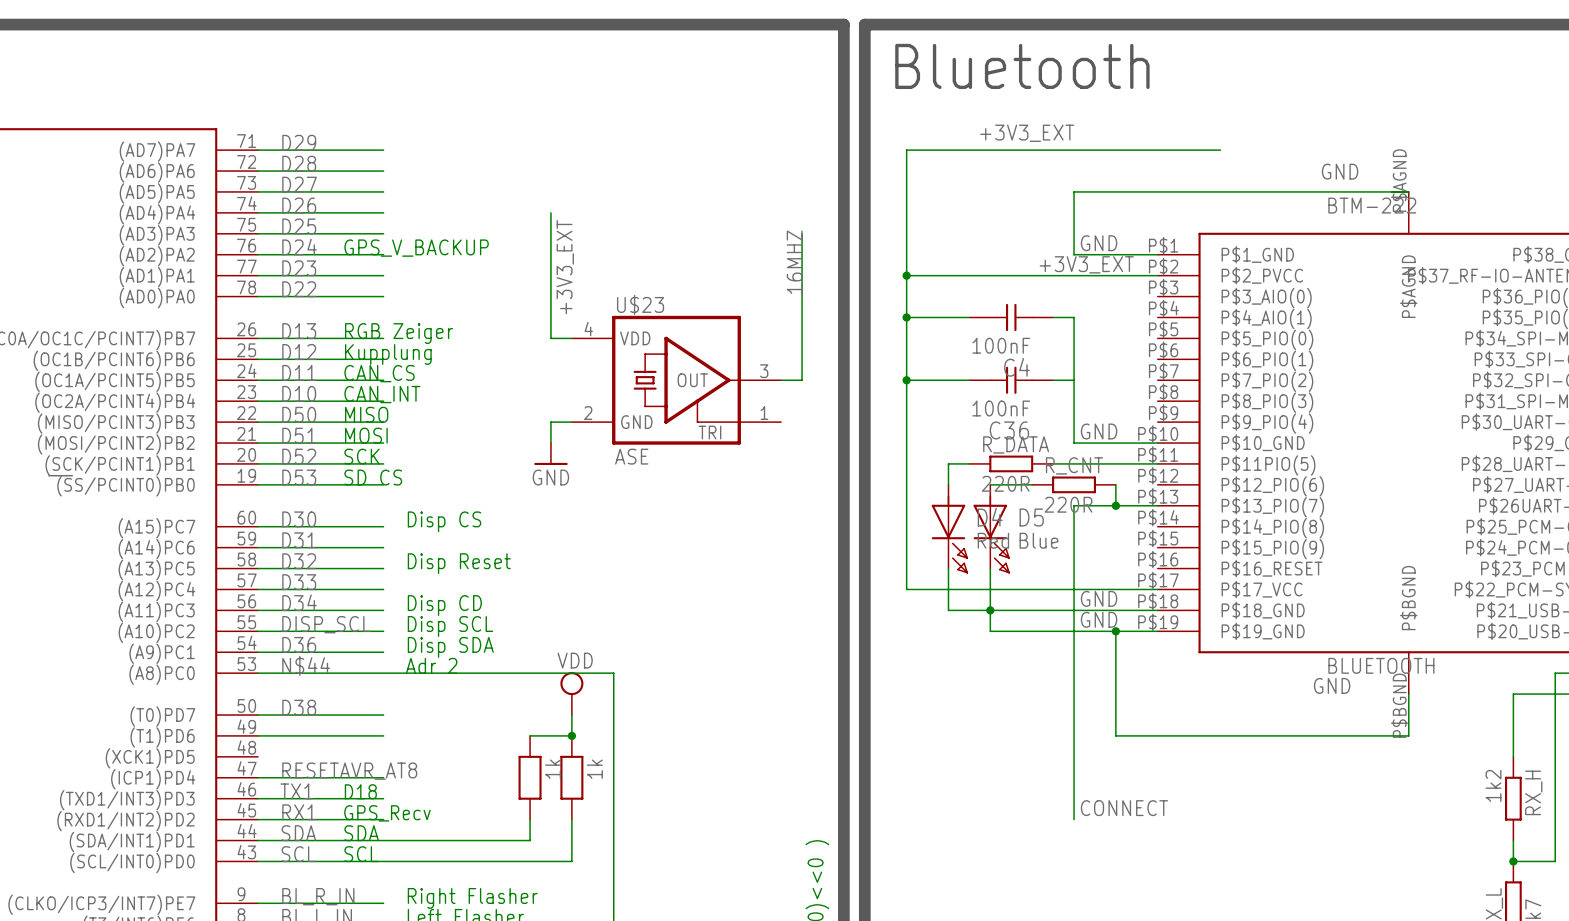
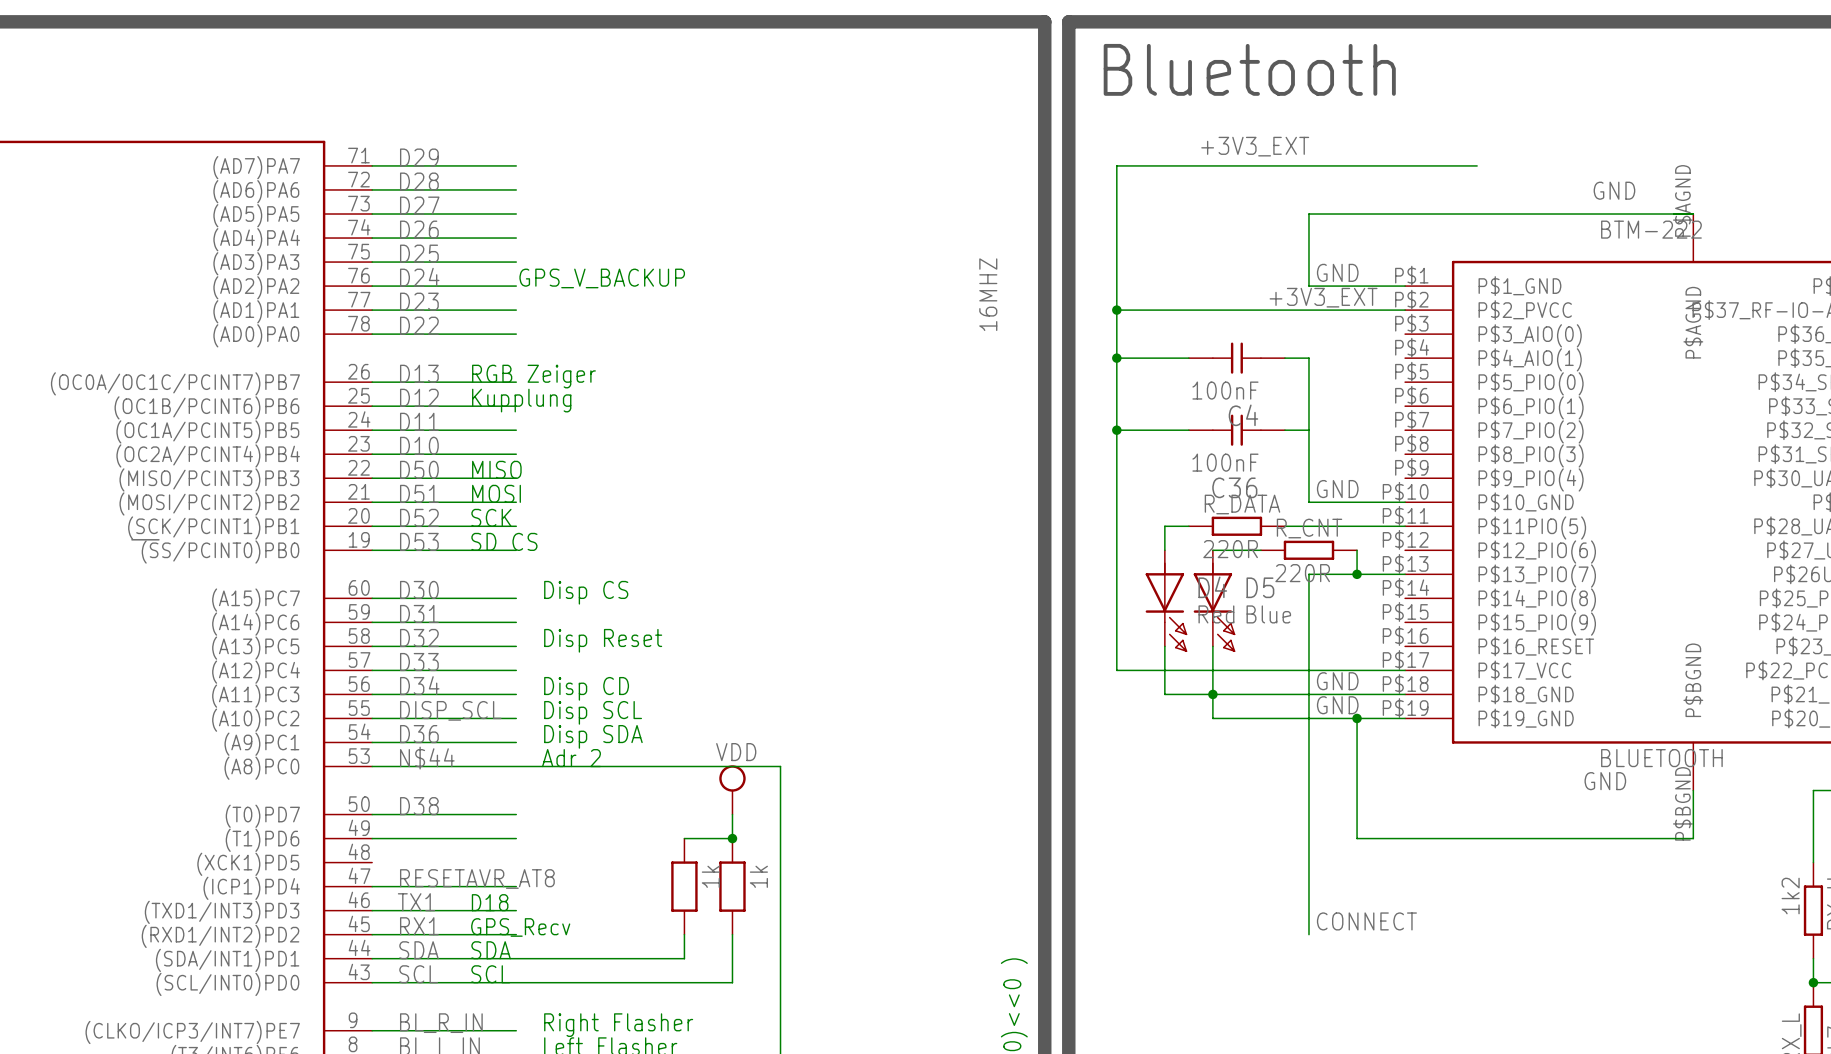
wire: (550, 212) (550, 338) (571, 338) -> none
wire: (802, 233) (802, 380) (781, 380) -> none
text position: GPS_V_BACKUP (416, 248) -> GPS_V_BACKUP (602, 278)
label: +3V3_EXT (565, 267) -> none
text: CAN_CS (379, 373) -> none
U$23: ASE (676, 380) -> none
text: CAN_INT (382, 394) -> none
wire: (571, 422) (550, 422) (550, 443) -> none
power symbol: GND (550, 454) -> none

